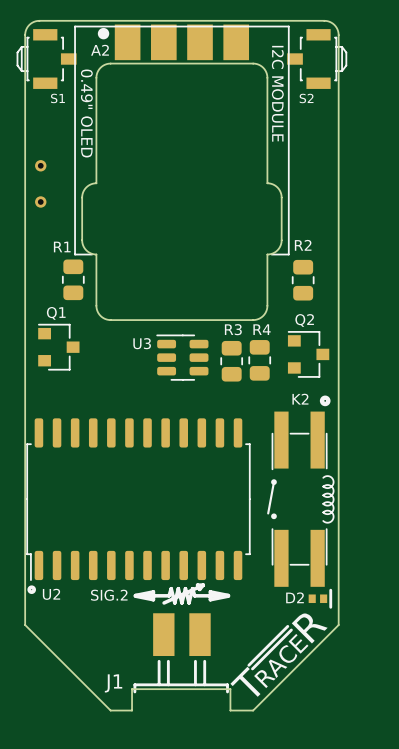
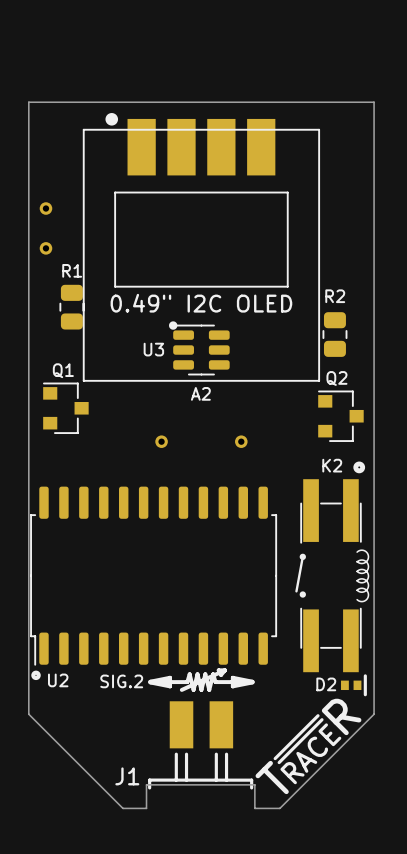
A2 footprint: [74, 24, 290, 256] -> [82, 113, 321, 382]
A2 name position: A2 (100, 50) -> A2 (200, 393)
S1: (46, 59) -> none
S2: (317, 59) -> none
board edge: (253, 63) (110, 63) (103, 65) (98, 70) (96, 77) (96, 183) (87, 186) (82, 193) (82, 240) (86, 250) (96, 254) (96, 307) (103, 318) (110, 320) (253, 320) (260, 318) (265, 312) (267, 305) (267, 254) (276, 251) (281, 243) (281, 197) (277, 187) (267, 183) (266, 74) (261, 66) (253, 63) -> none
board edge: (338, 69) (338, 31) (333, 23) (324, 20) (37, 20) (29, 24) (25, 31) (25, 69) -> (374, 102) (28, 102)
R1 name position: R1 (62, 247) -> R1 (72, 270)
drawing: none -> [169, 321, 178, 330]
R1 position: (73, 279) -> (71, 307)
U3 name position: U3 (142, 343) -> U3 (153, 349)
U3 position: (182, 357) -> (200, 350)
R4: (259, 360) -> none
R3: (231, 361) -> none
part: none -> (161, 441)
part: none -> (241, 441)

